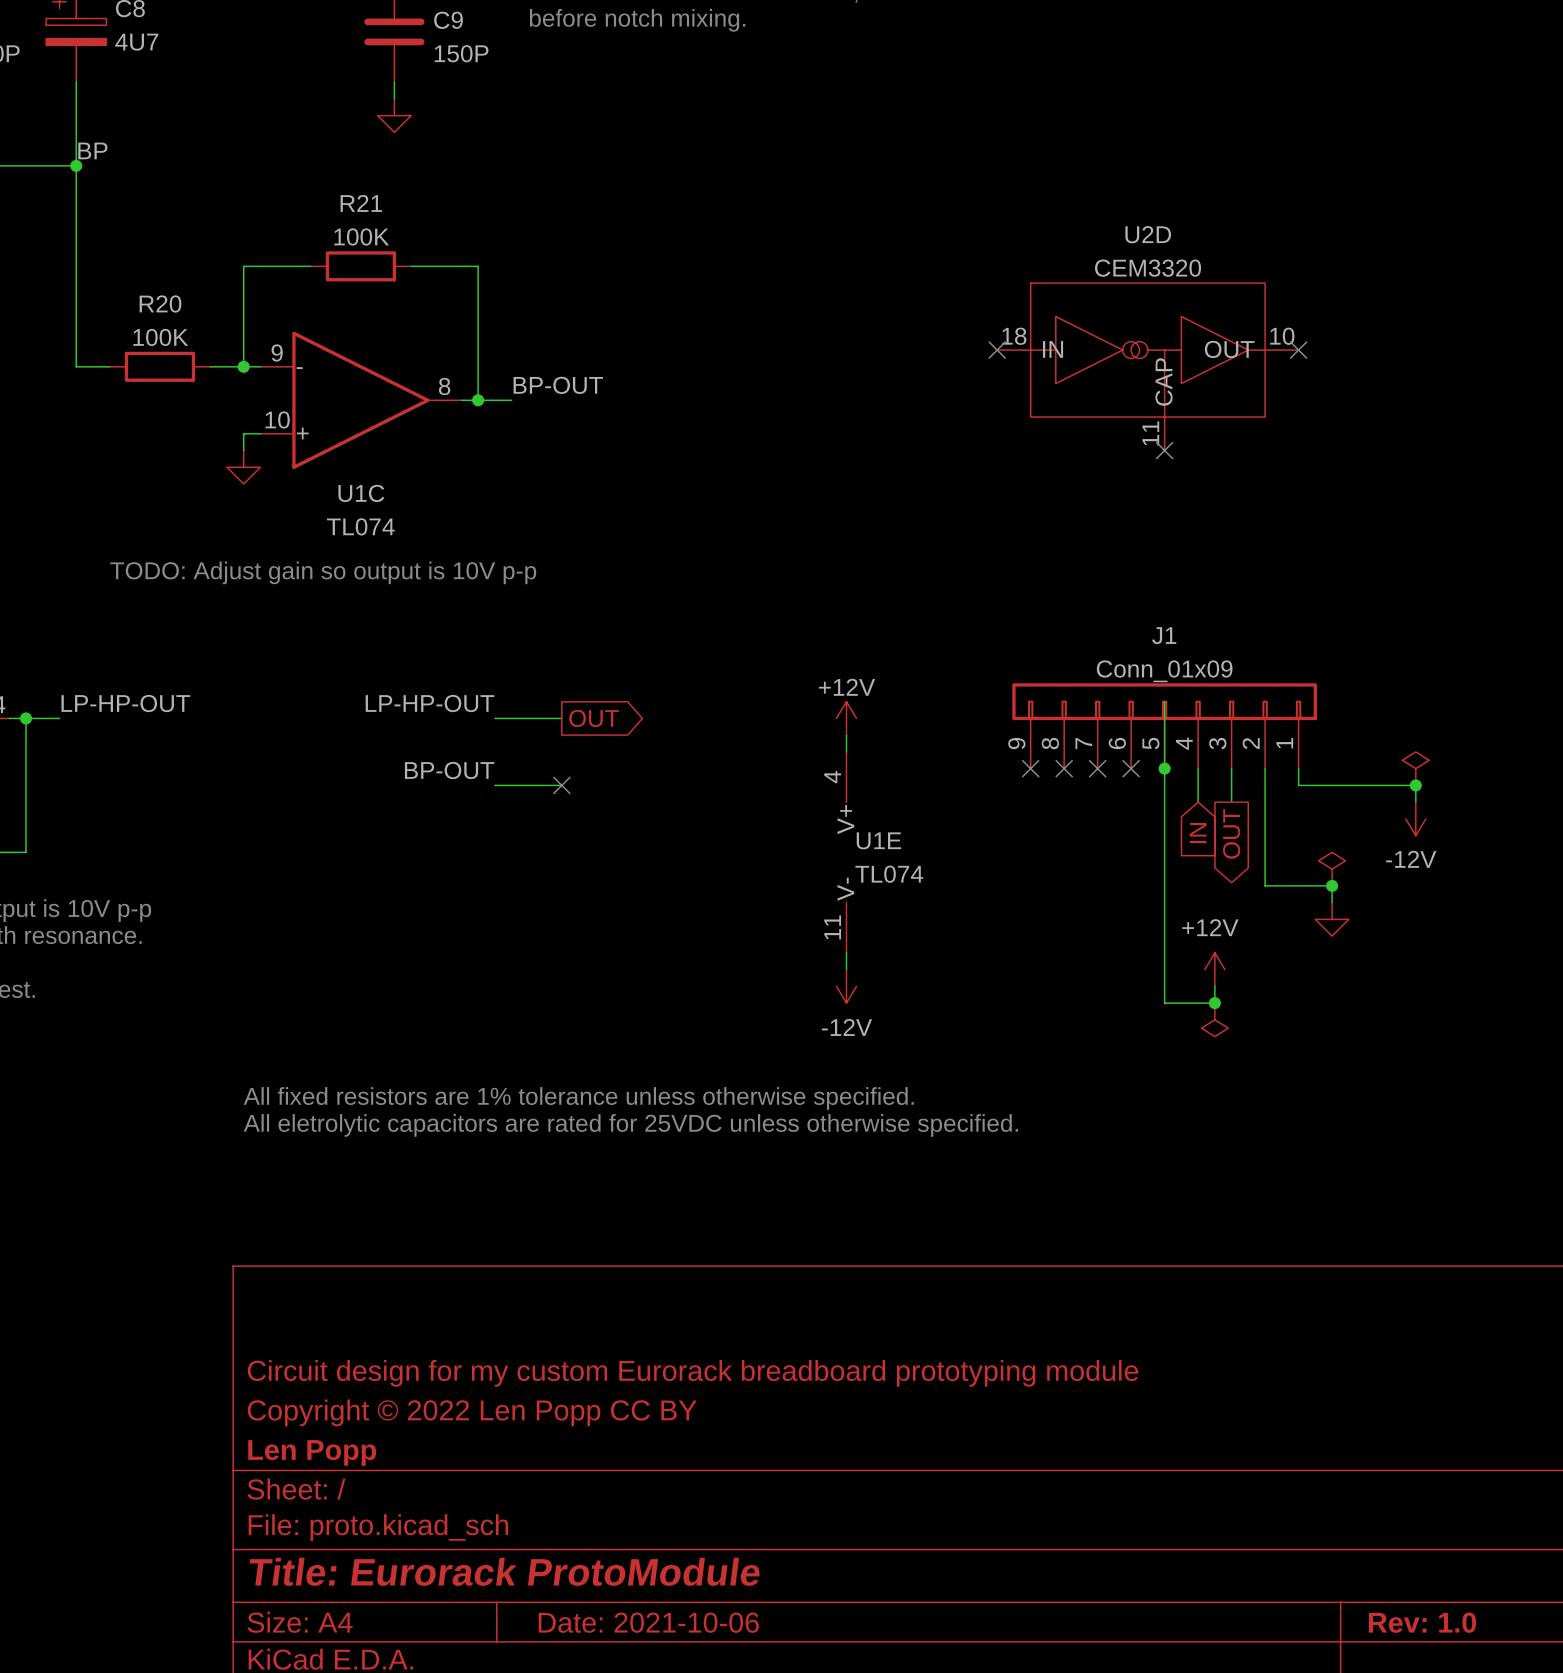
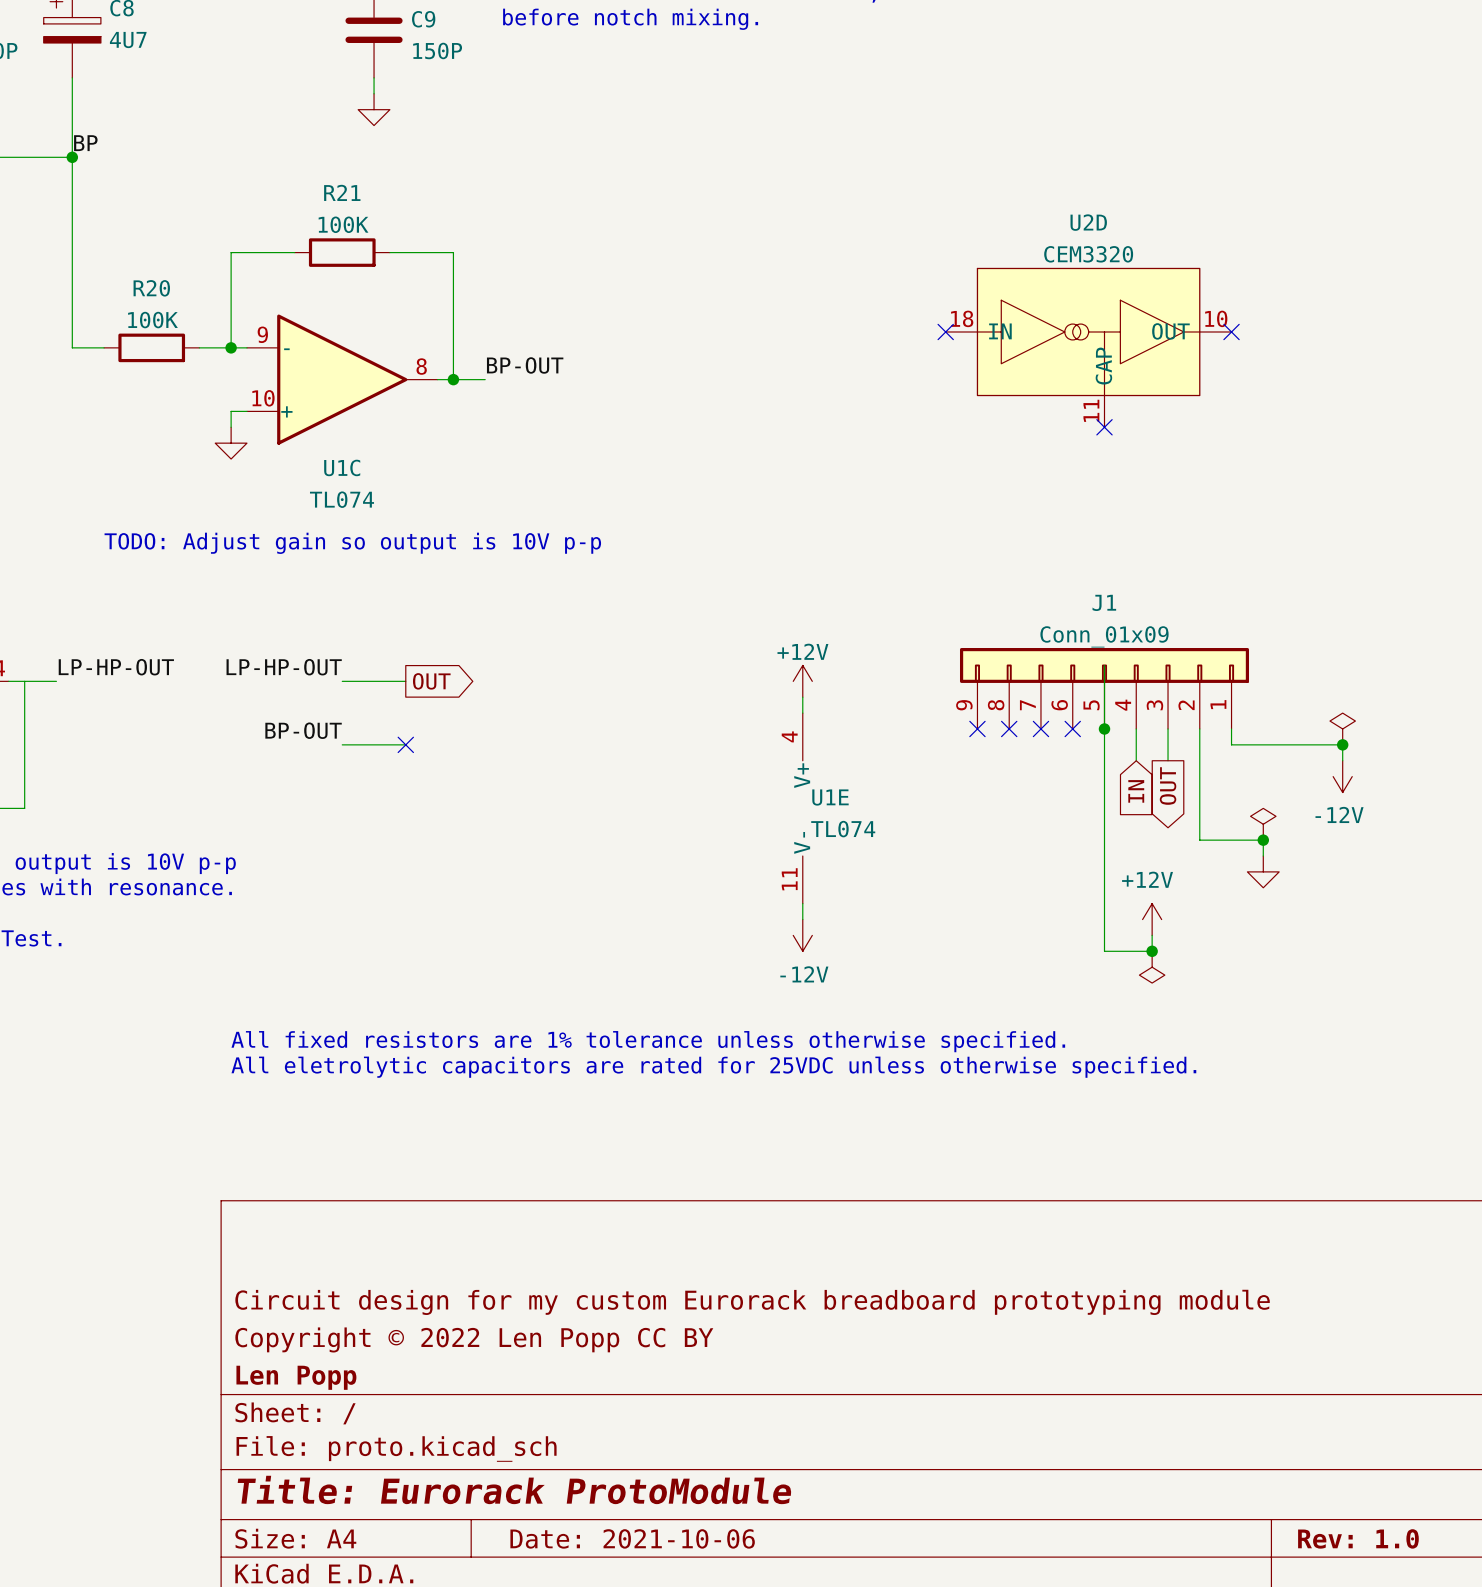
label position: LP-HP-OUT (429, 703) -> LP-HP-OUT (284, 667)
junction: (26, 718) -> none
wire: (494, 718) (561, 718) -> (342, 681) (405, 681)
global label position: OUT (594, 718) -> OUT (431, 681)
label position: BP-OUT (449, 770) -> BP-OUT (303, 730)
no-connect mark: none -> (405, 744)
wire: (494, 785) (561, 785) -> (342, 744) (405, 744)
no-connect mark: (561, 785) -> none

